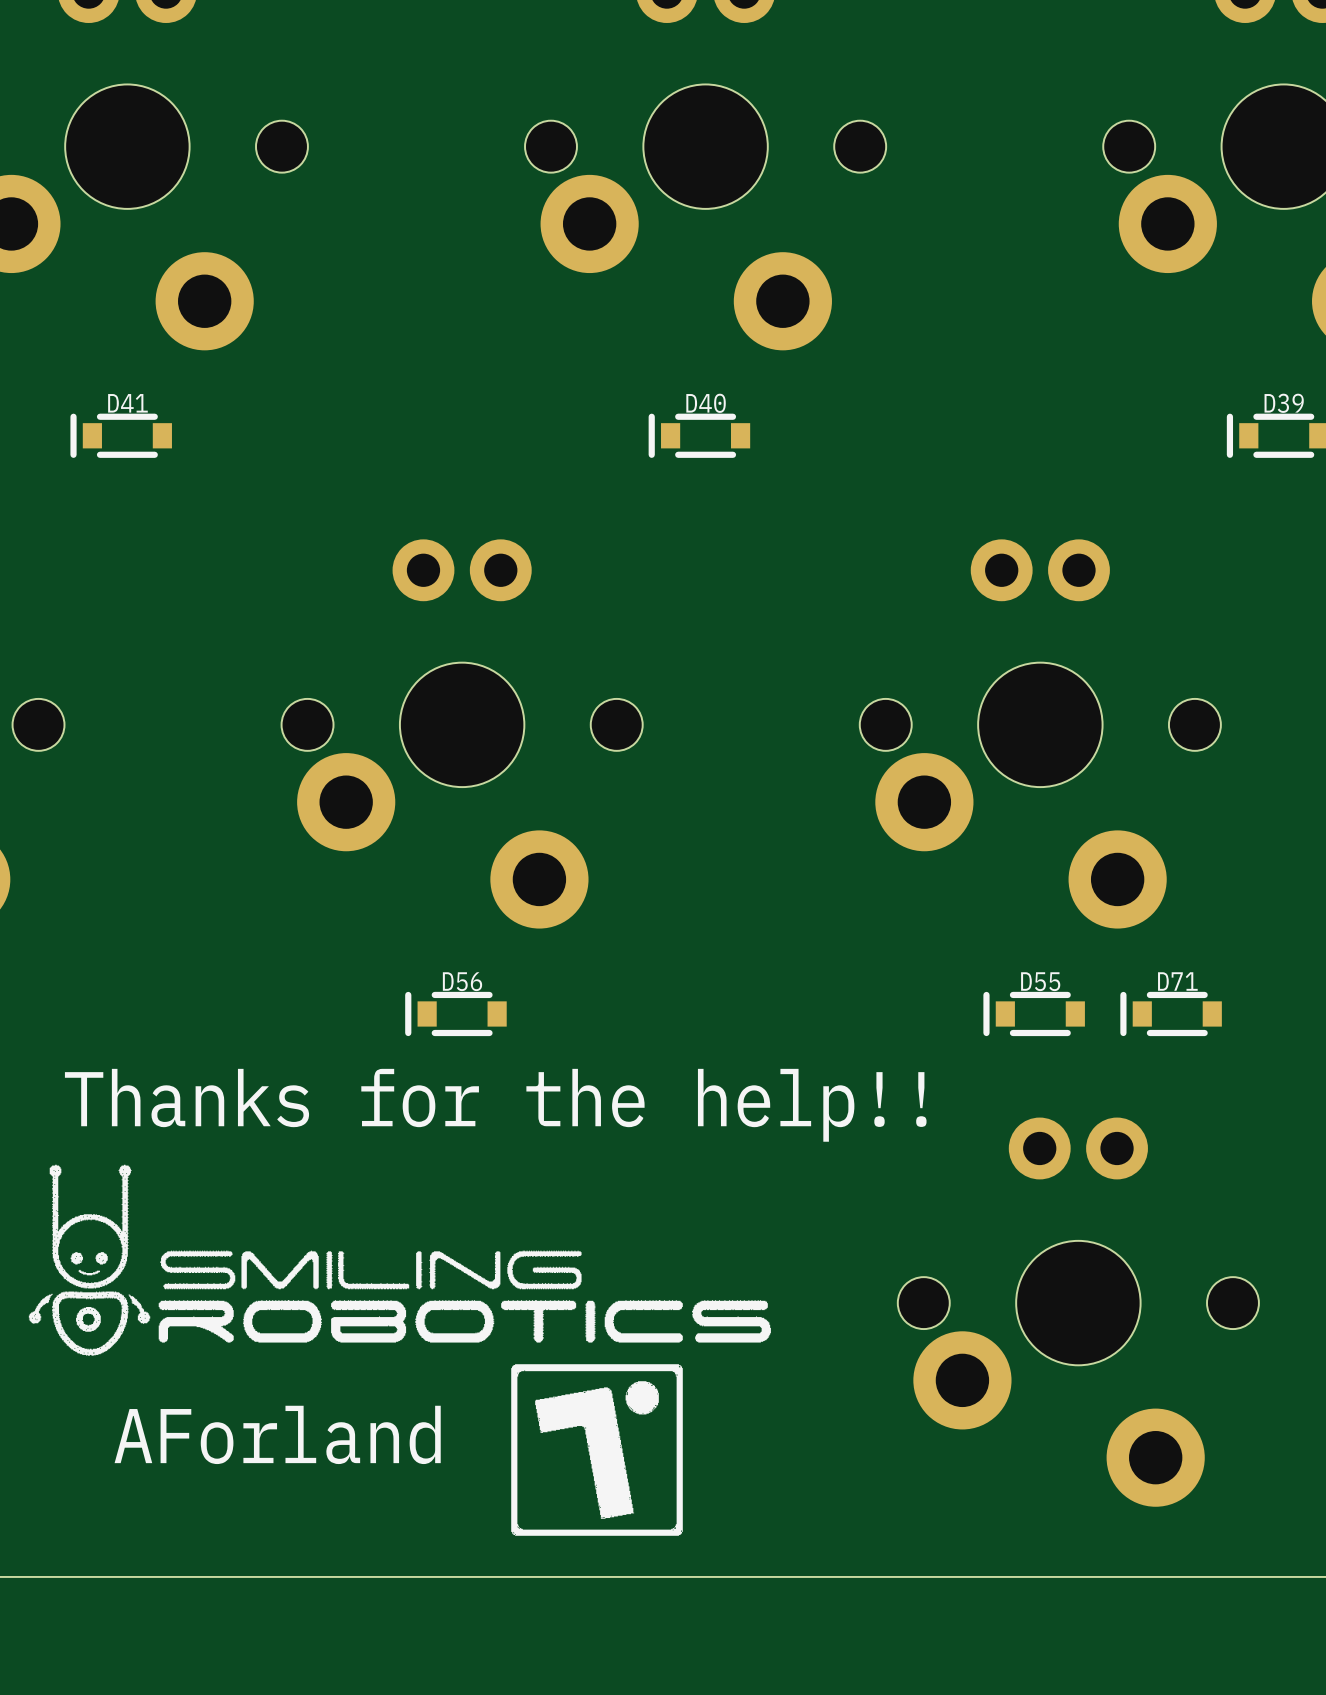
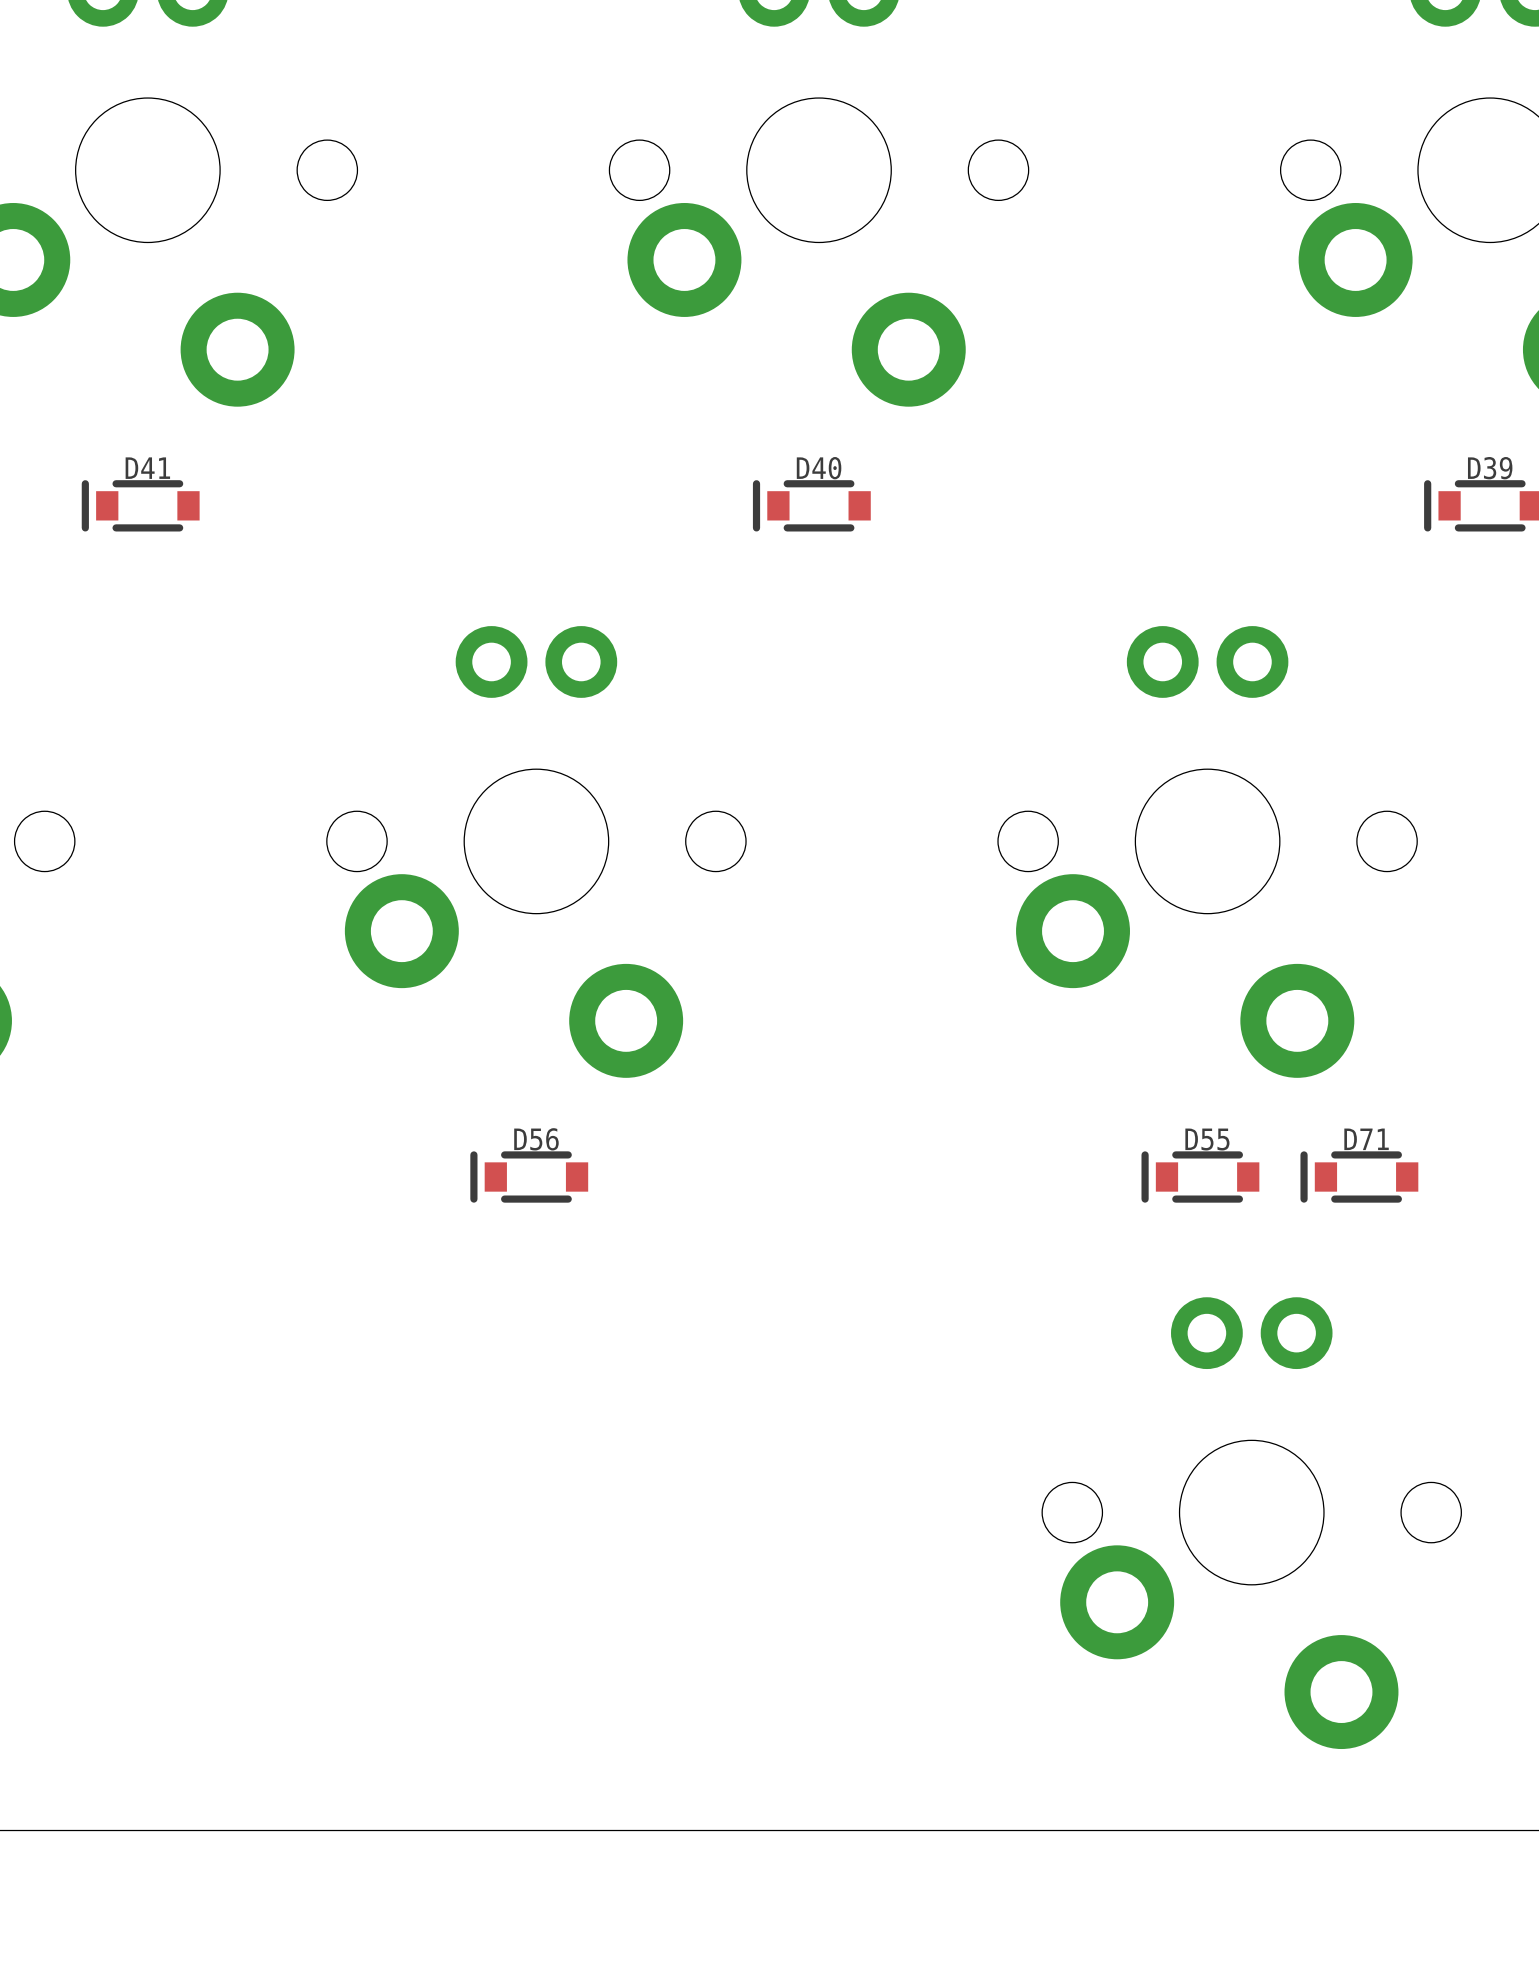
text: Thanks for the help!! (495, 1105) -> none
drawing: [28, 1164, 771, 1536] -> none
text: AForland (277, 1434) -> none

